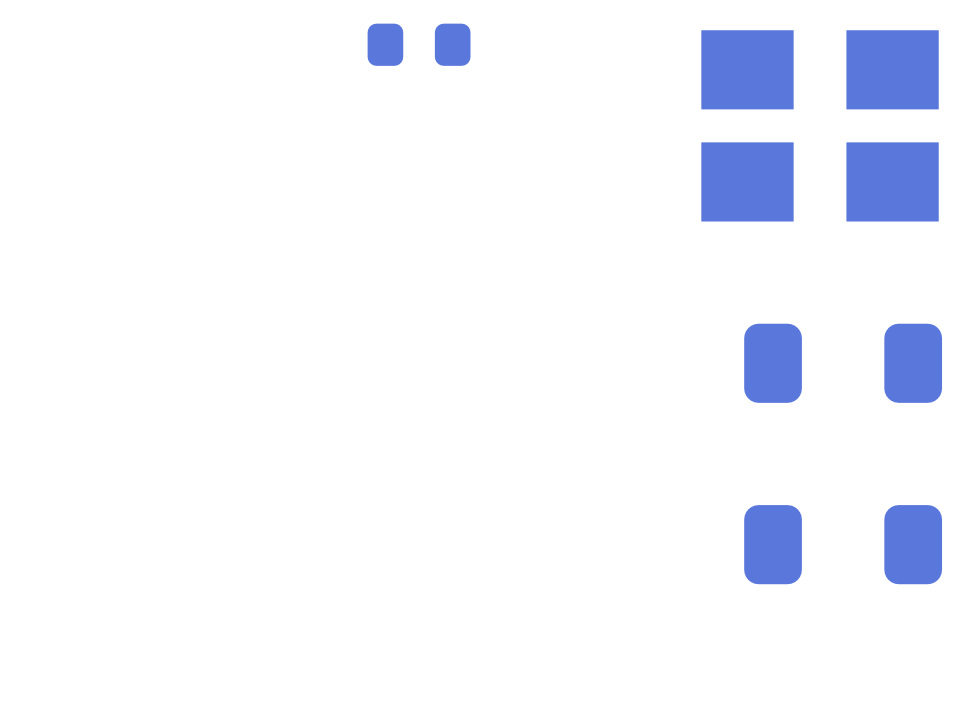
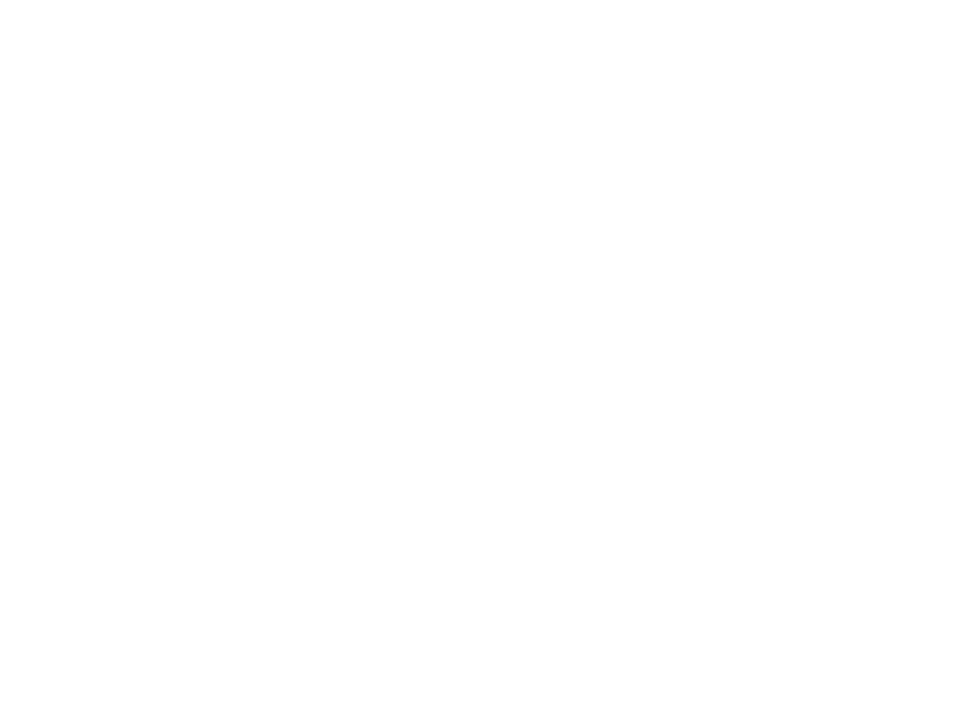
part: (419, 44) -> none
part: (820, 125) -> none
part: (843, 363) -> none
part: (843, 544) -> none

